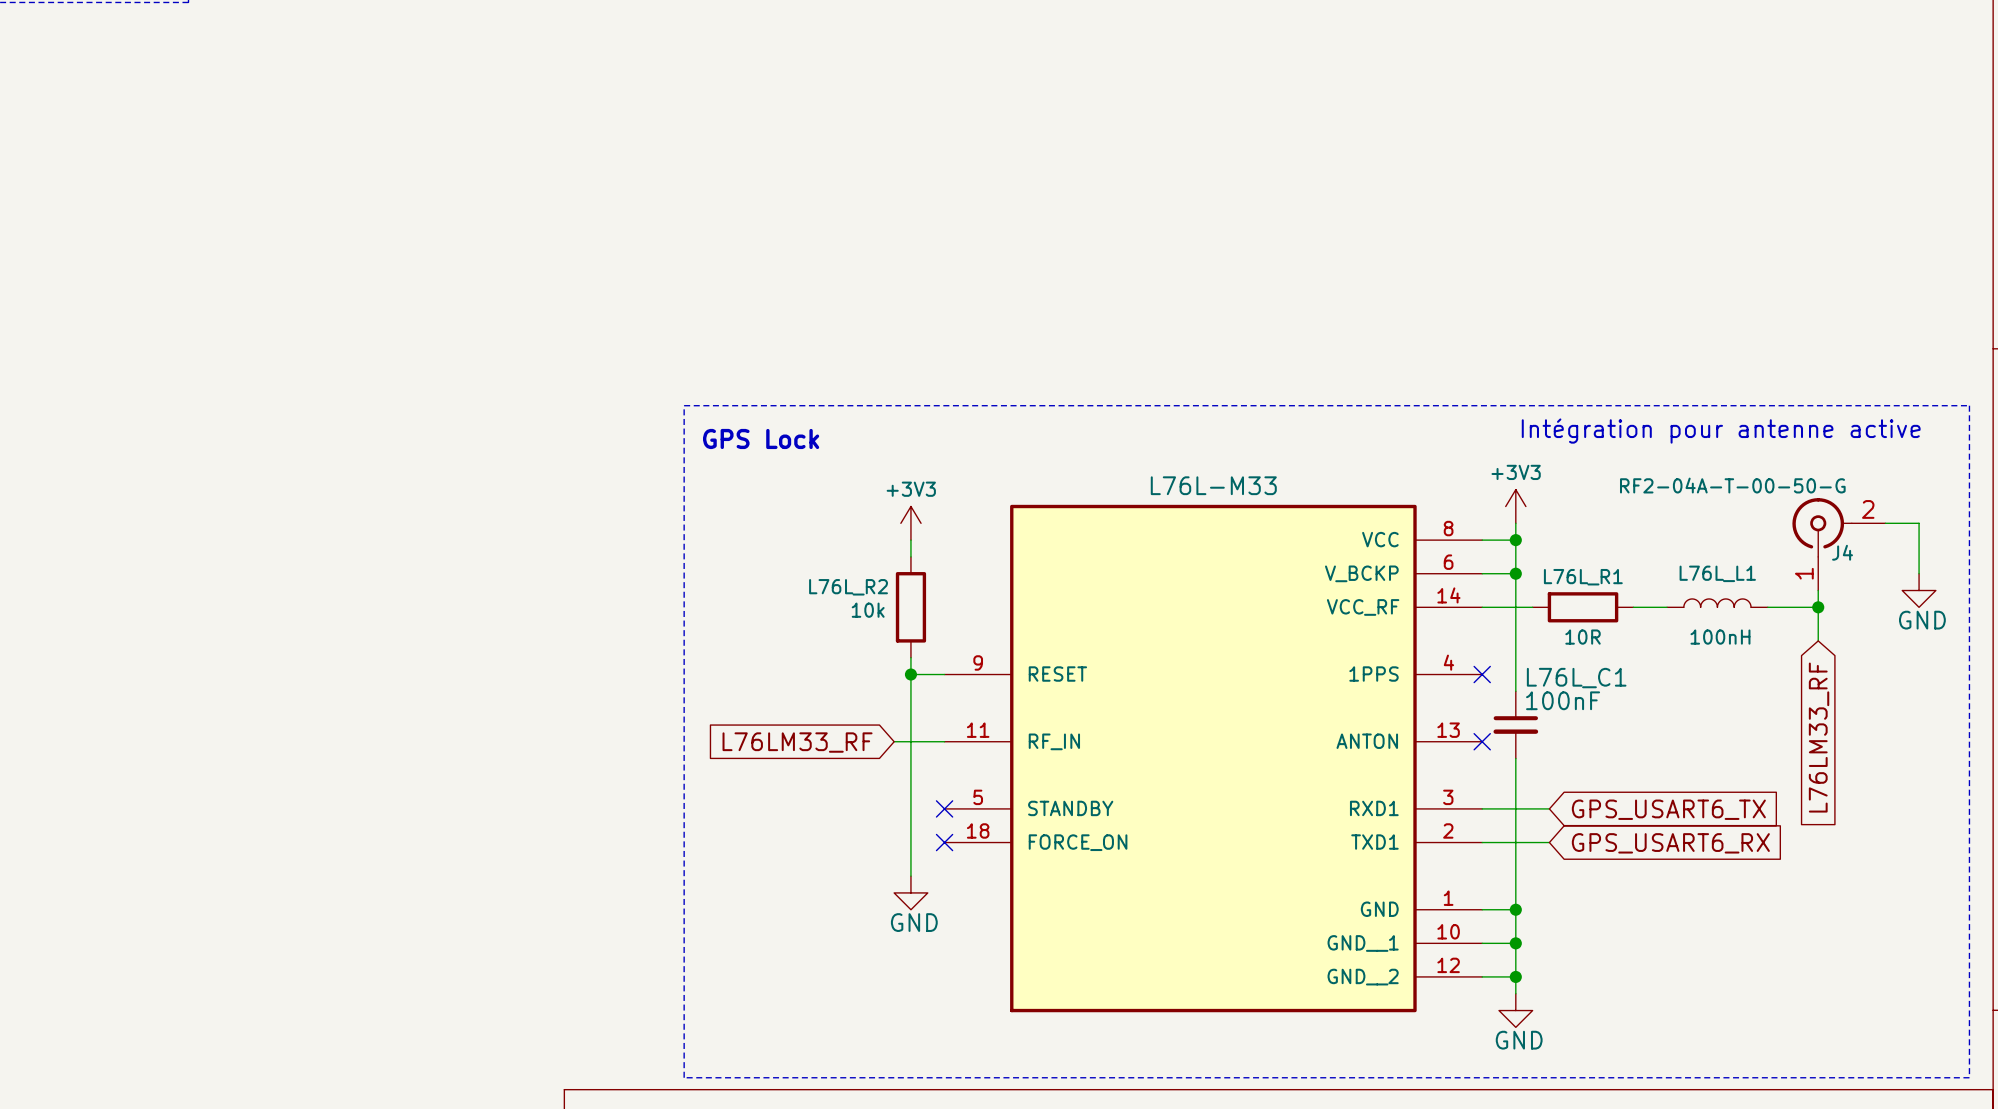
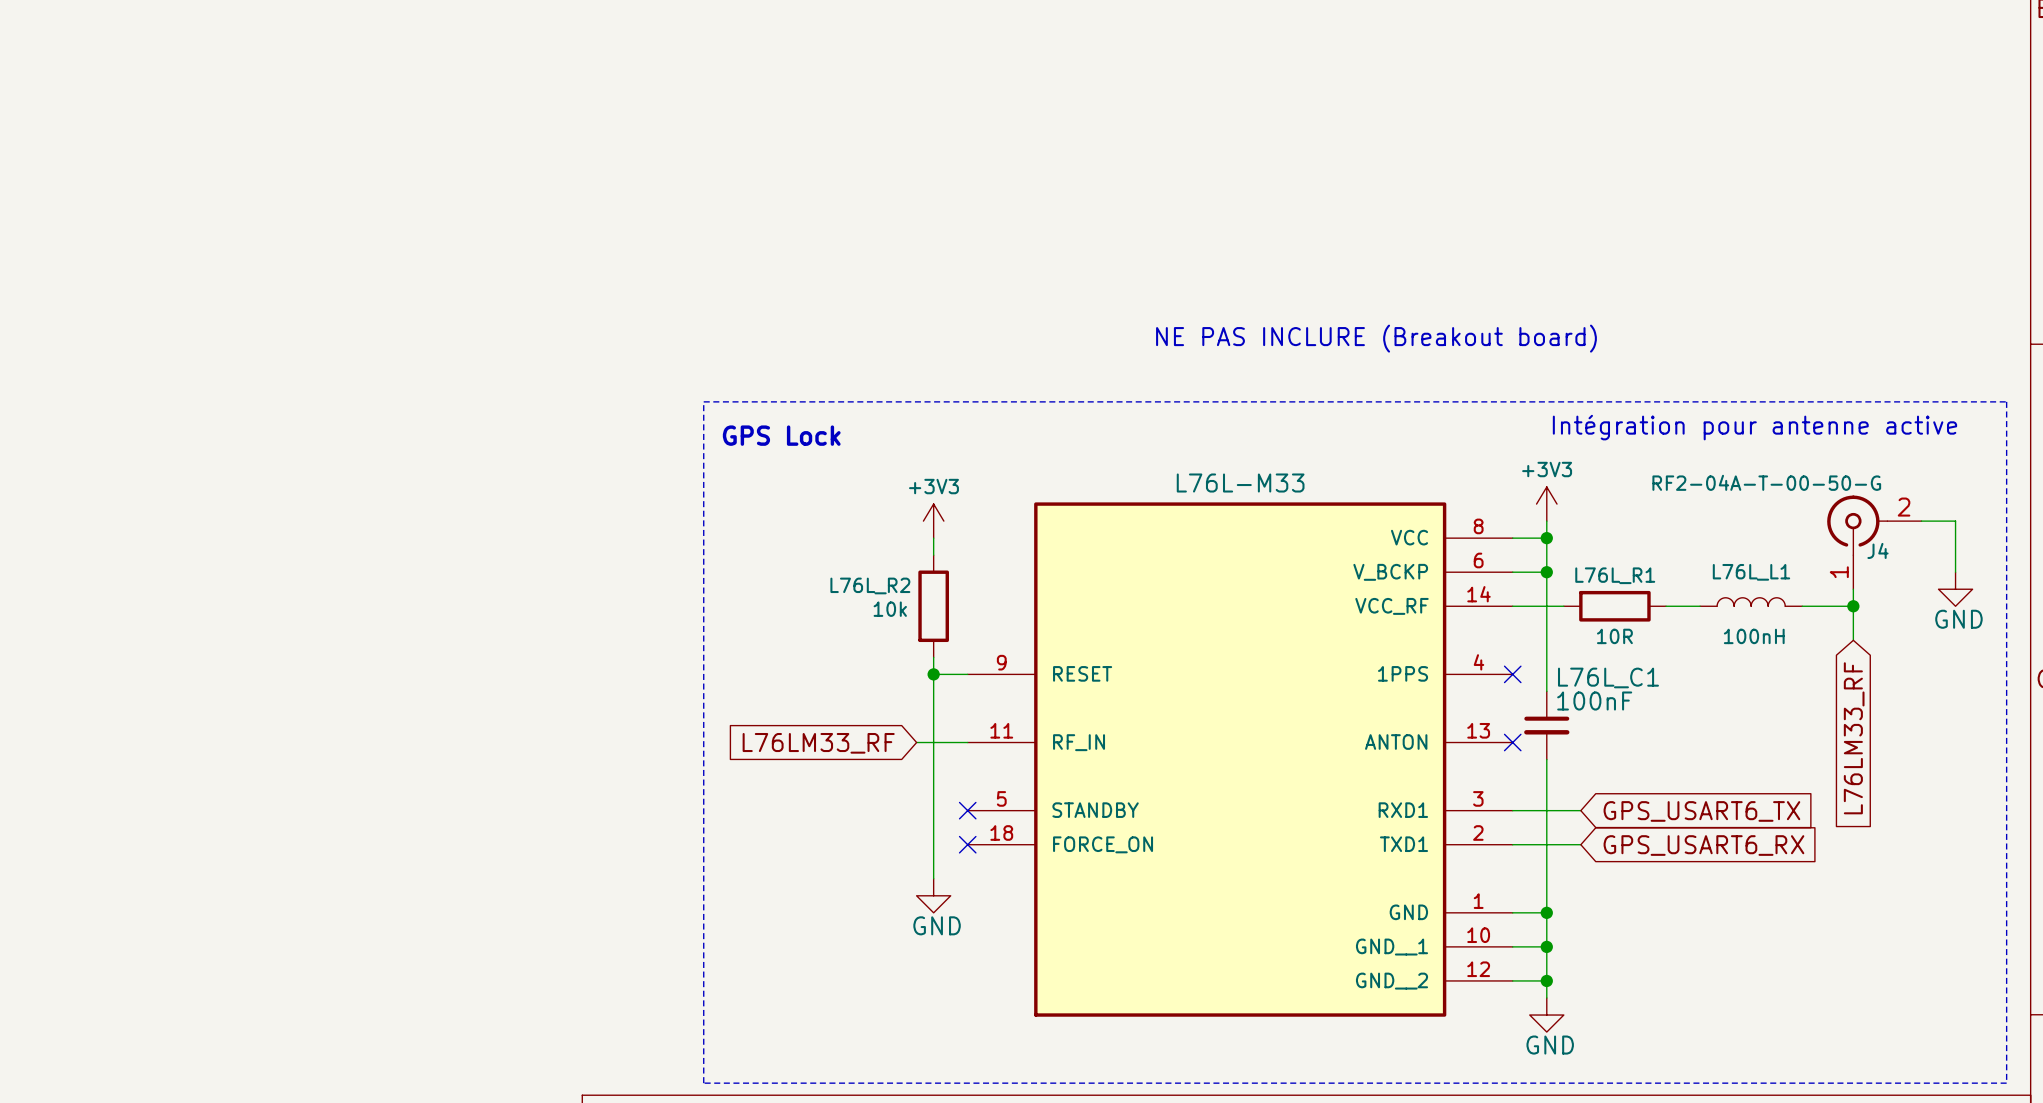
text: none -> NE PAS INCLURE (Breakout board) (1376, 338)

